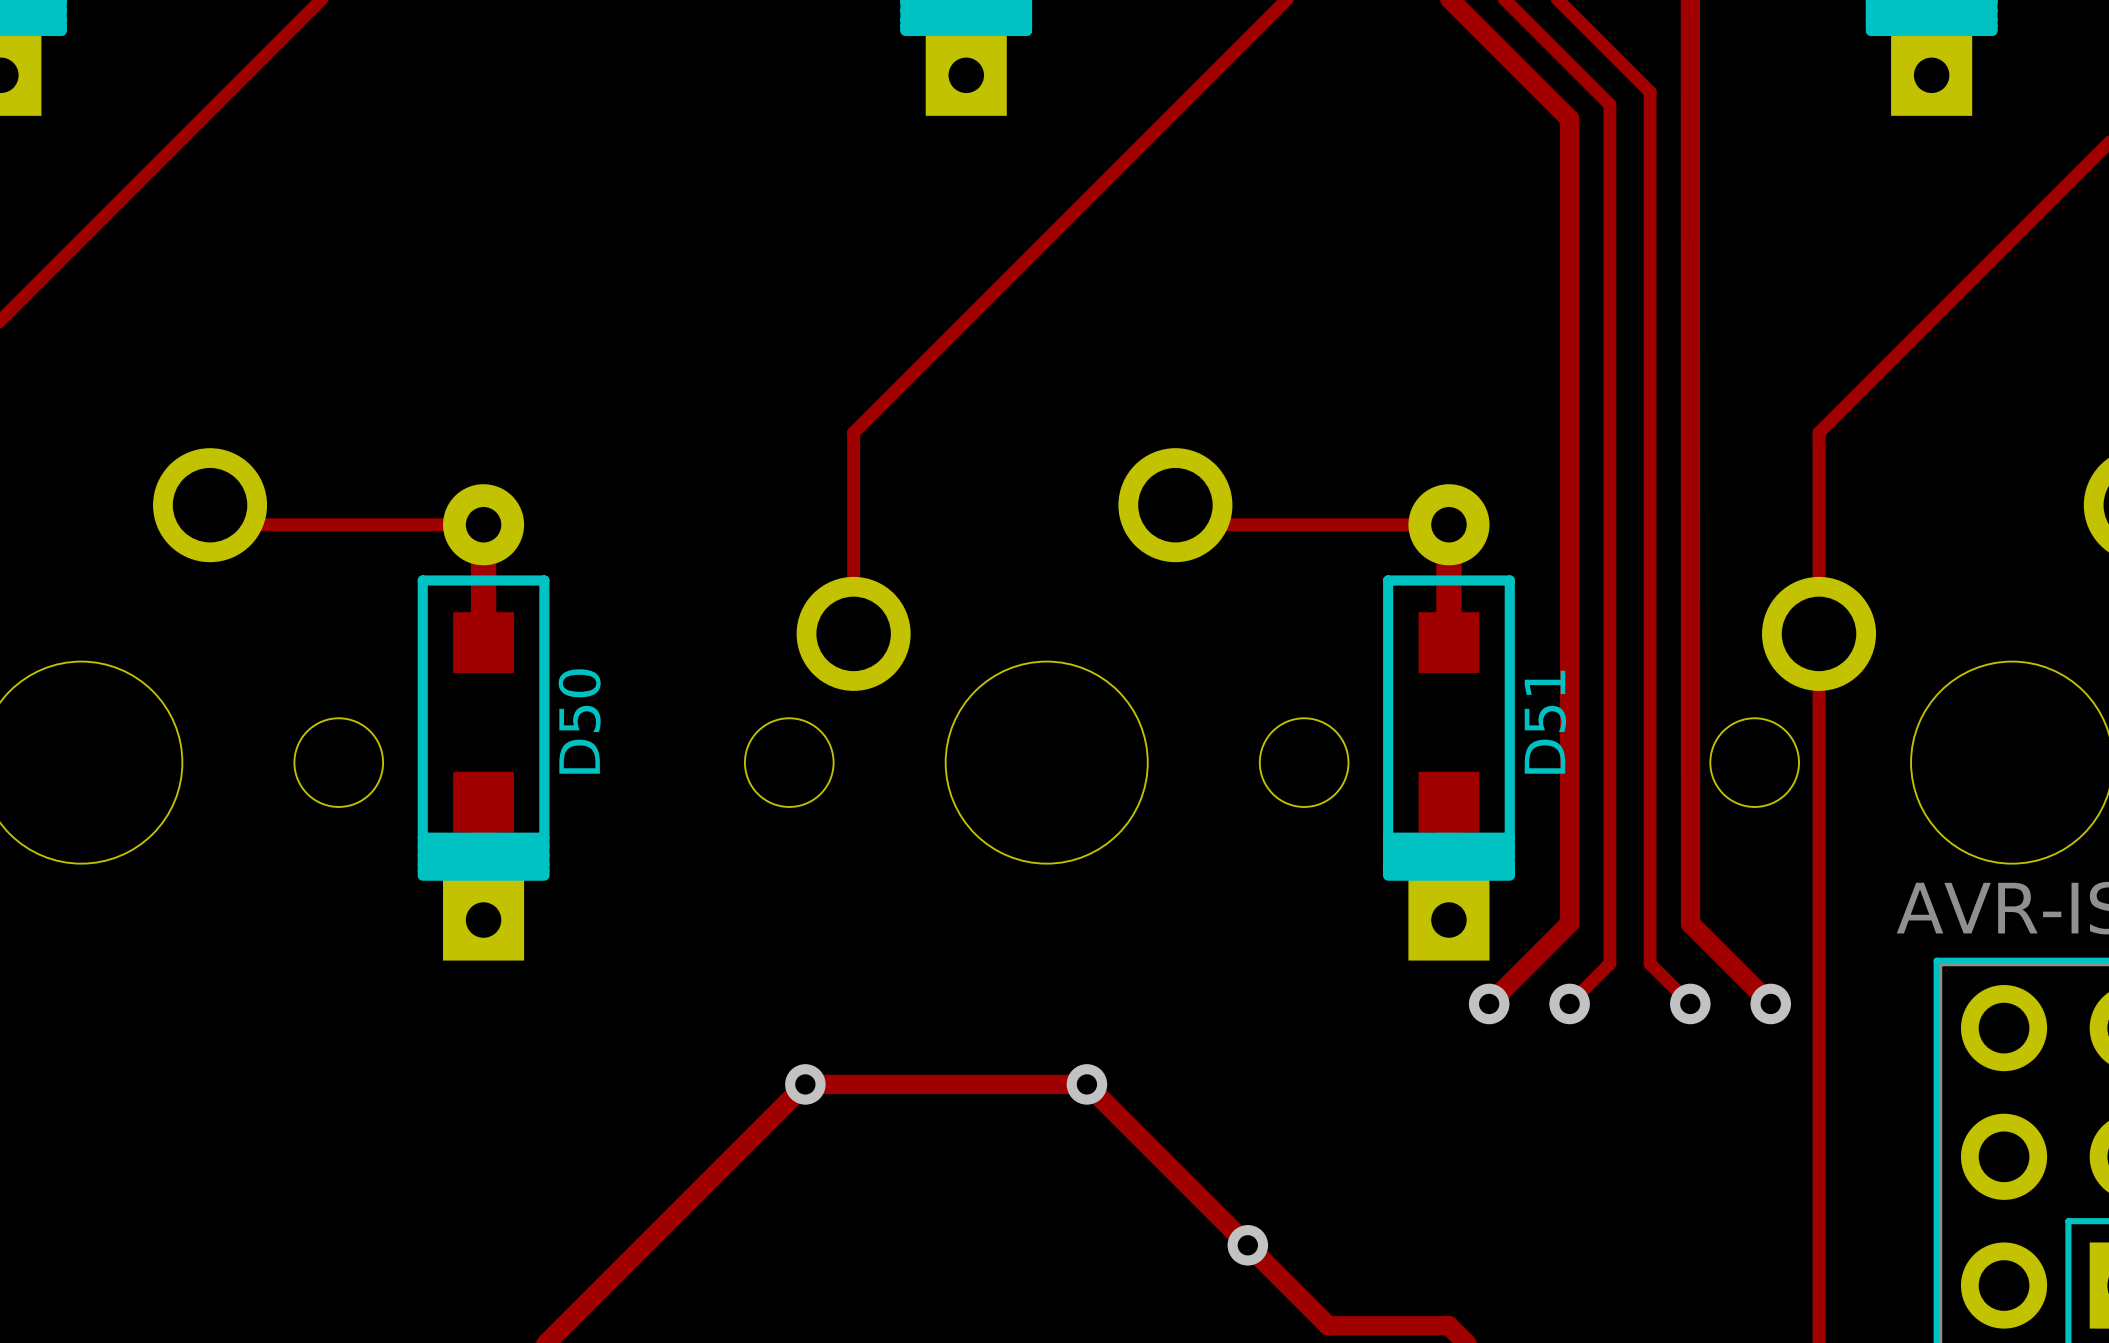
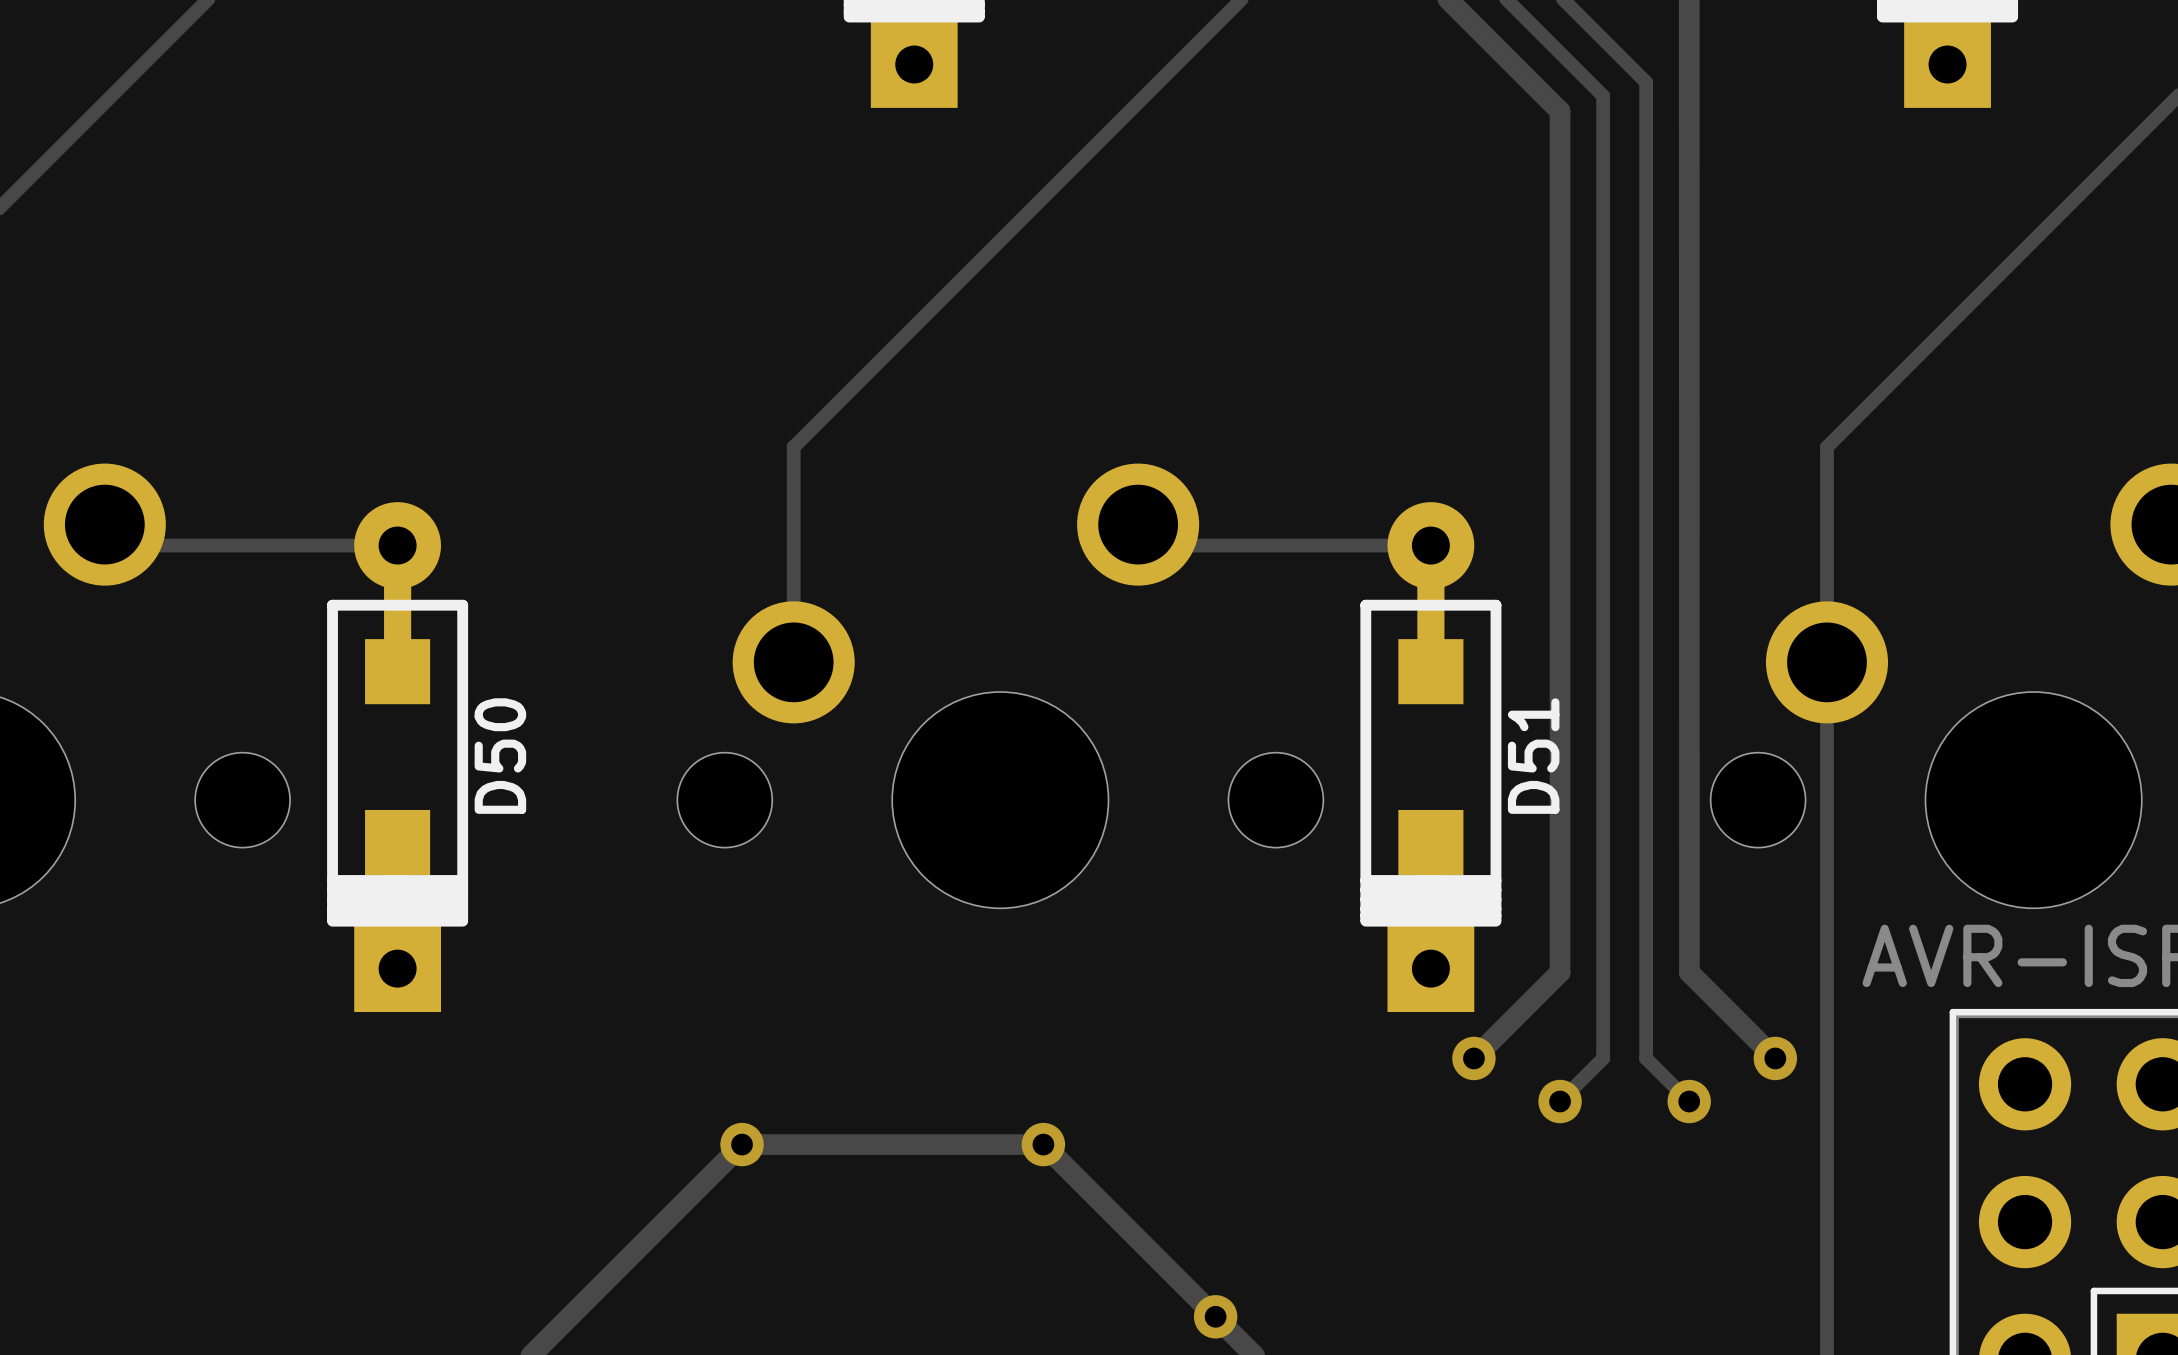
track: (1609, 963) (1569, 1003) -> (1603, 1015) (1603, 1058) (1560, 1101)
track: (1650, 963) (1690, 1003) -> (1646, 1015) (1646, 1058) (1689, 1101)
via position: (1569, 1003) -> (1560, 1101)
via position: (1690, 1003) -> (1689, 1101)

